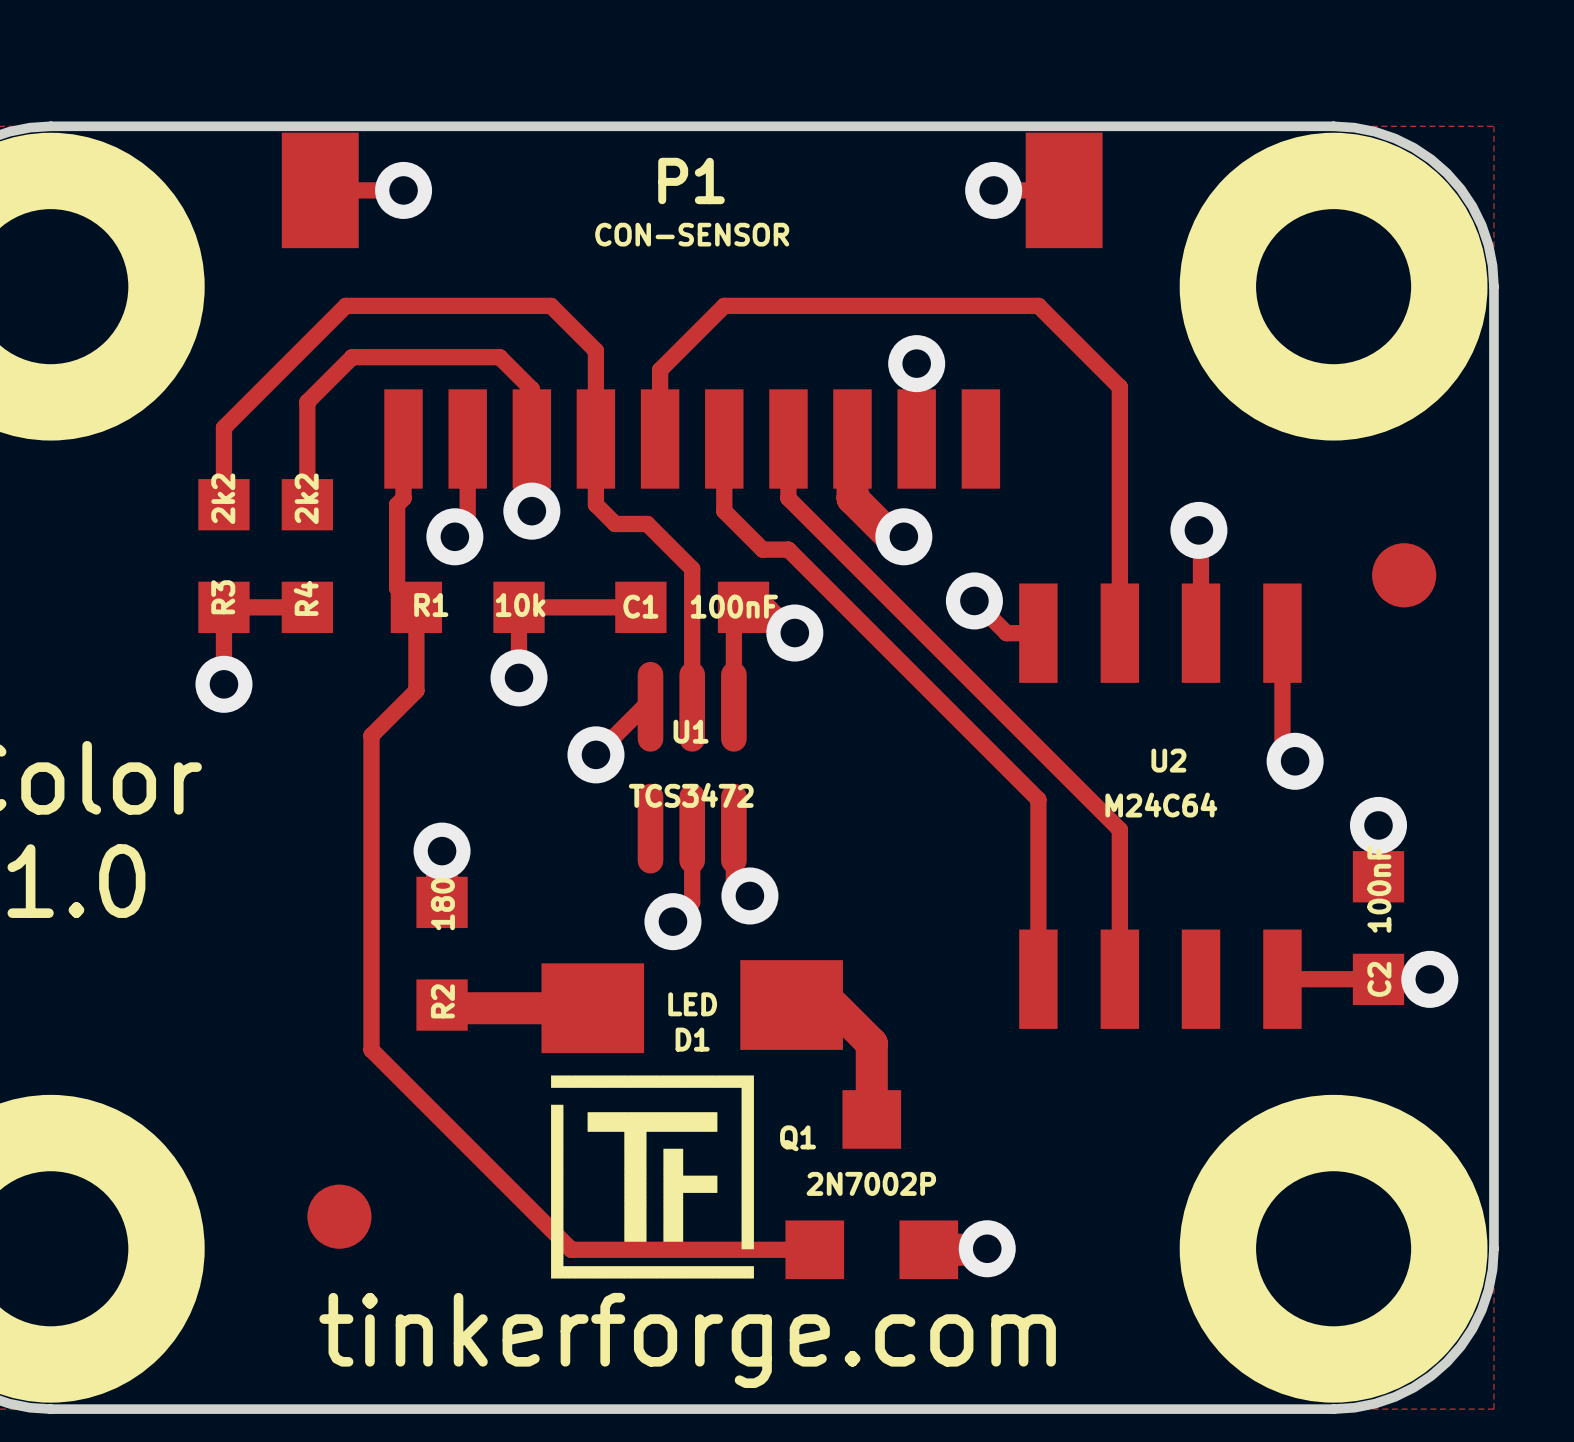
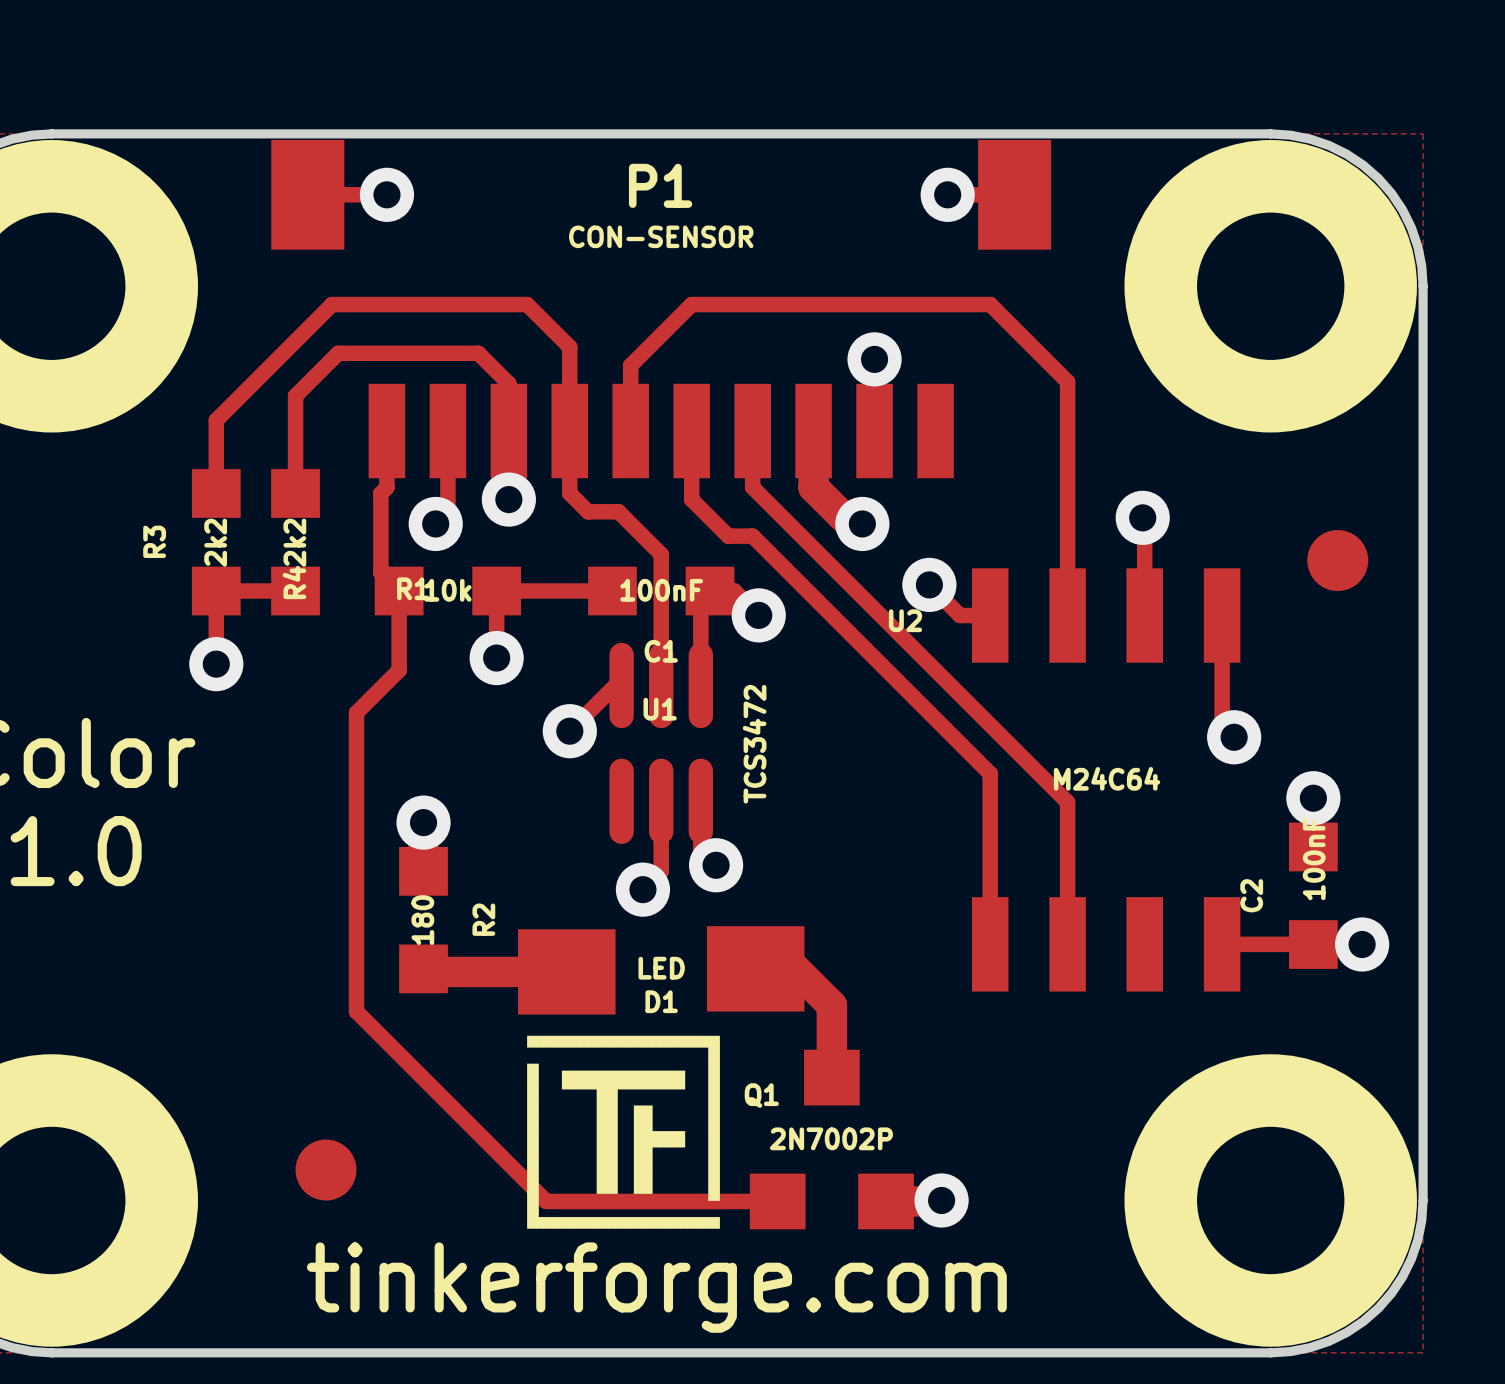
R3 value position: 2k2 (223, 498) -> 2k2 (215, 542)
R4 value position: 2k2 (306, 498) -> 2k2 (294, 542)
R3 name position: R3 (223, 597) -> R3 (154, 541)
R1 value position: 10k (520, 605) -> 10k (447, 590)
C1 name position: C1 (640, 606) -> C1 (661, 651)
C1 value position: 100nF (734, 606) -> 100nF (661, 590)
U2 name position: U2 (1168, 760) -> U2 (905, 620)
U1 value rotation: 0° (691, 795) -> 90° counterclockwise (754, 744)
R2 value position: 180 (442, 904) -> 180 (422, 920)
C2 name position: C2 (1379, 979) -> C2 (1251, 895)
R2 name position: R2 (442, 1001) -> R2 (483, 919)

